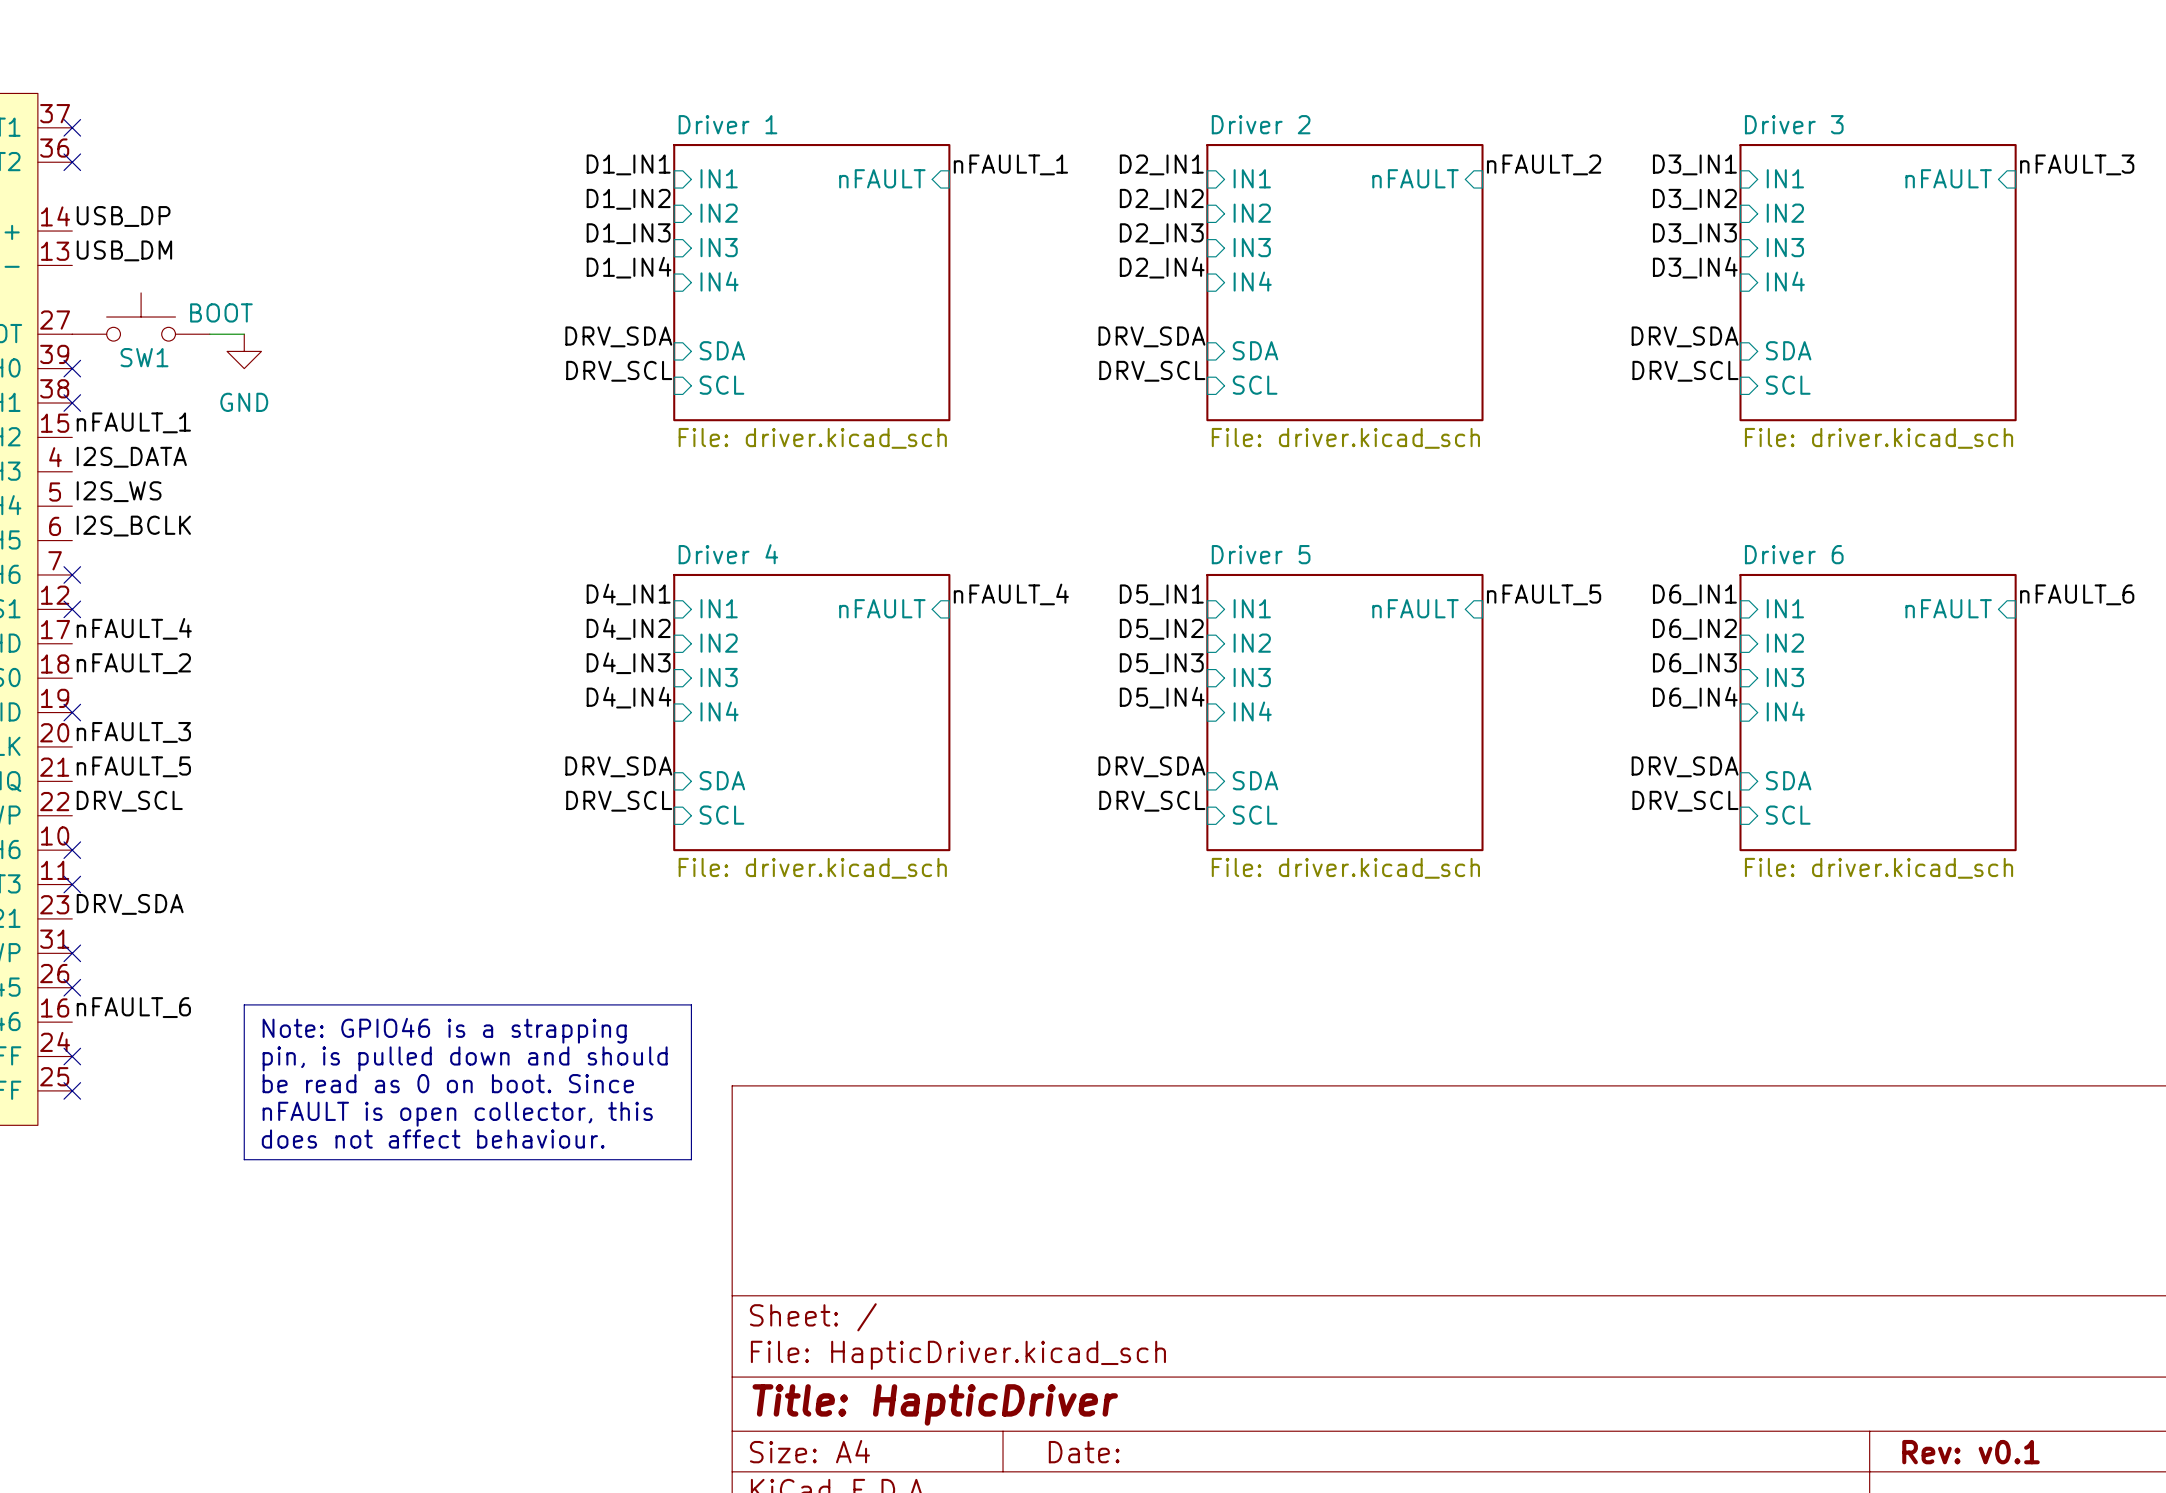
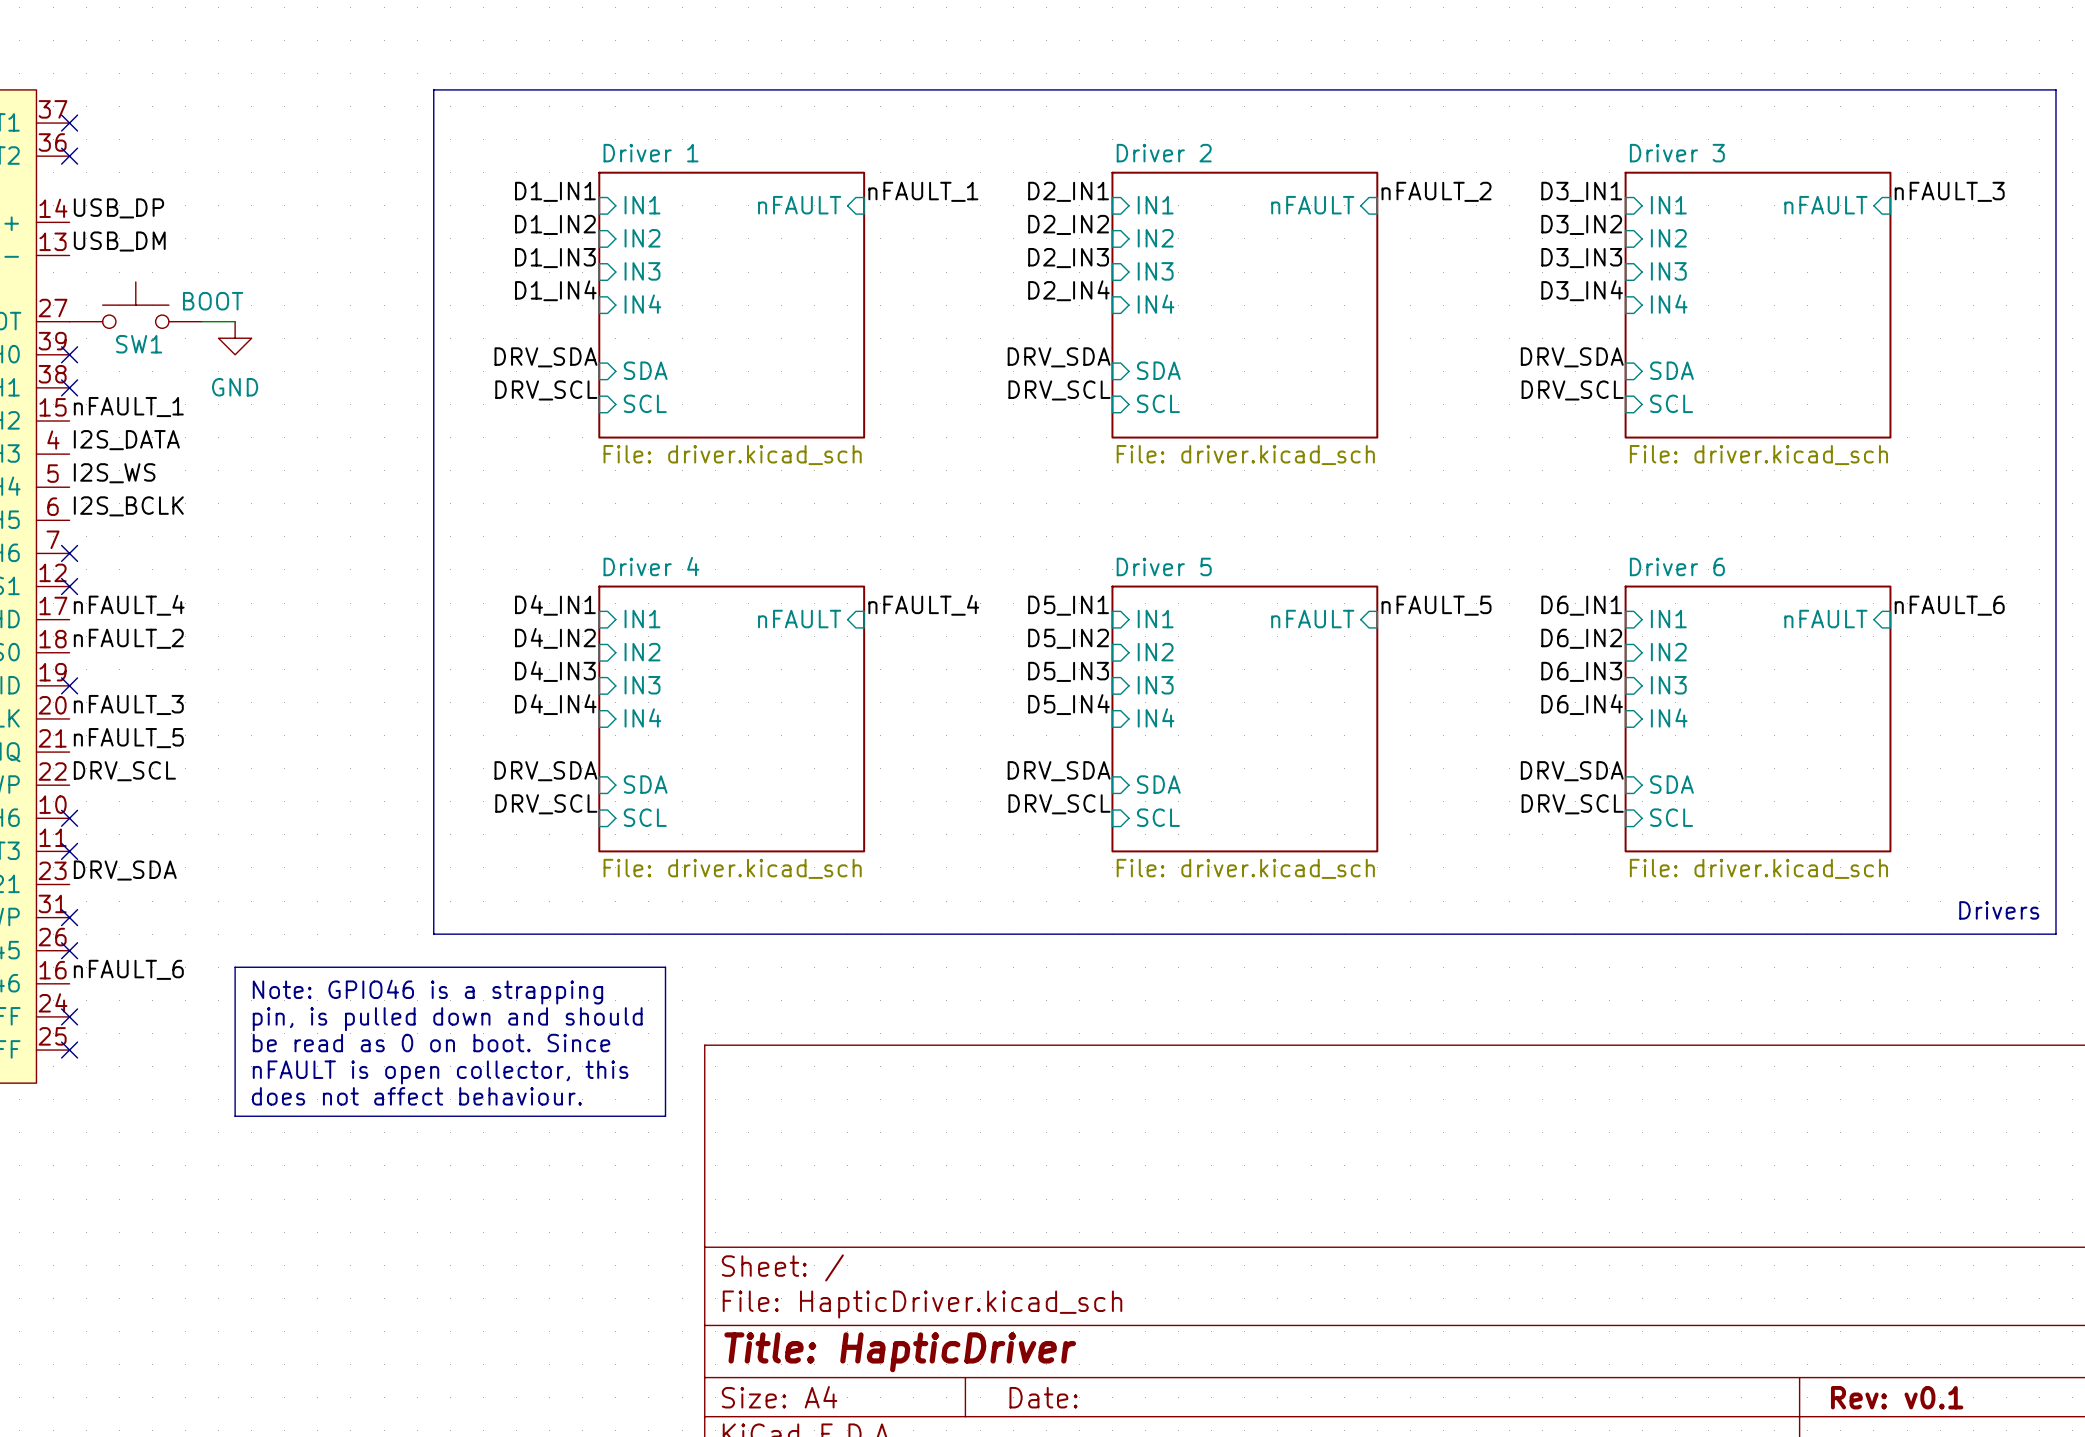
line: none -> (433, 89) (2055, 89) (2055, 934) (433, 934) (433, 89)
label position: D1_IN1 (628, 164) -> D1_IN1 (555, 191)
label position: nFAULT_1 (1010, 164) -> nFAULT_1 (923, 191)
label position: D2_IN1 (1161, 164) -> D2_IN1 (1068, 191)
label position: nFAULT_2 (1544, 164) -> nFAULT_2 (1436, 191)
label position: D3_IN1 (1694, 164) -> D3_IN1 (1581, 191)
label position: nFAULT_3 (2077, 164) -> nFAULT_3 (1949, 191)
sheet pin position: IN1 (719, 178) -> IN1 (642, 205)
sheet pin position: nFAULT (882, 178) -> nFAULT (799, 205)
sheet pin position: IN1 (1252, 178) -> IN1 (1155, 205)
sheet pin position: nFAULT (1415, 178) -> nFAULT (1312, 205)
sheet pin position: IN1 (1785, 178) -> IN1 (1668, 205)
sheet pin position: nFAULT (1948, 178) -> nFAULT (1825, 205)
label position: D1_IN2 (628, 199) -> D1_IN2 (555, 224)
label position: D2_IN2 (1161, 199) -> D2_IN2 (1068, 224)
label position: D3_IN2 (1694, 199) -> D3_IN2 (1581, 224)
sheet pin position: IN2 (719, 213) -> IN2 (642, 238)
sheet pin position: IN2 (1252, 213) -> IN2 (1155, 238)
sheet pin position: IN2 (1785, 213) -> IN2 (1668, 238)
label position: D1_IN3 (628, 233) -> D1_IN3 (555, 258)
label position: D2_IN3 (1161, 233) -> D2_IN3 (1068, 258)
label position: D3_IN3 (1694, 233) -> D3_IN3 (1581, 258)
sheet pin position: IN3 (719, 247) -> IN3 (642, 271)
sheet pin position: IN3 (1252, 247) -> IN3 (1155, 271)
sheet pin position: IN3 (1785, 247) -> IN3 (1668, 271)
label position: D1_IN4 (629, 267) -> D1_IN4 (555, 290)
label position: D2_IN4 (1162, 267) -> D2_IN4 (1068, 290)
label position: D3_IN4 (1695, 267) -> D3_IN4 (1582, 290)
sheet pin position: IN4 (719, 281) -> IN4 (642, 304)
sheet pin position: IN4 (1252, 281) -> IN4 (1156, 304)
sheet pin position: IN4 (1785, 281) -> IN4 (1669, 304)
sheet Driver 1 position: (811, 282) -> (731, 305)
sheet Driver 2 position: (1344, 282) -> (1244, 305)
sheet Driver 3 position: (1878, 282) -> (1758, 305)
label position: DRV_SDA (618, 336) -> DRV_SDA (545, 357)
label position: DRV_SDA (1151, 336) -> DRV_SDA (1059, 357)
label position: DRV_SDA (1685, 336) -> DRV_SDA (1572, 357)
sheet pin position: SDA (722, 350) -> SDA (645, 370)
sheet pin position: SDA (1255, 350) -> SDA (1158, 370)
sheet pin position: SDA (1788, 350) -> SDA (1671, 370)
label position: DRV_SCL (619, 371) -> DRV_SCL (546, 390)
label position: DRV_SCL (1152, 371) -> DRV_SCL (1059, 390)
label position: DRV_SCL (1685, 371) -> DRV_SCL (1572, 390)
sheet pin position: SCL (721, 385) -> SCL (645, 403)
sheet pin position: SCL (1255, 385) -> SCL (1158, 403)
sheet pin position: SCL (1788, 385) -> SCL (1671, 403)
label position: D4_IN1 (628, 594) -> D4_IN1 (555, 605)
label position: nFAULT_4 (1011, 594) -> nFAULT_4 (923, 605)
label position: D5_IN1 (1161, 594) -> D5_IN1 (1068, 605)
label position: nFAULT_5 (1544, 594) -> nFAULT_5 (1436, 605)
label position: D6_IN1 (1694, 594) -> D6_IN1 (1581, 605)
label position: nFAULT_6 (2077, 594) -> nFAULT_6 (1949, 605)
sheet pin position: IN1 (719, 608) -> IN1 (642, 619)
sheet pin position: nFAULT (882, 608) -> nFAULT (799, 619)
sheet pin position: IN1 (1252, 608) -> IN1 (1155, 619)
sheet pin position: nFAULT (1415, 608) -> nFAULT (1312, 619)
sheet pin position: IN1 (1785, 608) -> IN1 (1668, 619)
sheet pin position: nFAULT (1948, 608) -> nFAULT (1825, 619)
label position: D4_IN2 (628, 628) -> D4_IN2 (555, 638)
label position: D5_IN2 (1161, 629) -> D5_IN2 (1068, 638)
label position: D6_IN2 (1694, 629) -> D6_IN2 (1581, 638)
sheet pin position: IN2 (719, 643) -> IN2 (642, 652)
sheet pin position: IN2 (1252, 643) -> IN2 (1155, 652)
sheet pin position: IN2 (1785, 643) -> IN2 (1668, 652)
label position: D4_IN3 (628, 663) -> D4_IN3 (555, 671)
label position: D5_IN3 (1161, 663) -> D5_IN3 (1068, 671)
label position: D6_IN3 (1694, 663) -> D6_IN3 (1581, 671)
sheet pin position: IN3 (719, 677) -> IN3 (642, 685)
sheet pin position: IN3 (1252, 677) -> IN3 (1155, 685)
sheet pin position: IN3 (1785, 677) -> IN3 (1668, 685)
label position: D4_IN4 (629, 697) -> D4_IN4 (555, 704)
label position: D5_IN4 (1162, 697) -> D5_IN4 (1068, 704)
label position: D6_IN4 (1695, 697) -> D6_IN4 (1582, 704)
sheet pin position: IN4 (719, 711) -> IN4 (642, 717)
sheet pin position: IN4 (1252, 711) -> IN4 (1156, 717)
sheet pin position: IN4 (1785, 711) -> IN4 (1669, 717)
sheet Driver 4 position: (811, 712) -> (731, 718)
sheet Driver 5 position: (1344, 712) -> (1244, 718)
sheet Driver 6 position: (1878, 712) -> (1758, 718)
label position: DRV_SDA (618, 766) -> DRV_SDA (545, 771)
label position: DRV_SDA (1151, 766) -> DRV_SDA (1059, 771)
label position: DRV_SDA (1685, 766) -> DRV_SDA (1572, 771)
sheet pin position: SDA (722, 780) -> SDA (645, 784)
sheet pin position: SDA (1255, 780) -> SDA (1158, 784)
sheet pin position: SDA (1788, 780) -> SDA (1671, 784)
label position: DRV_SCL (619, 801) -> DRV_SCL (546, 804)
label position: DRV_SCL (1152, 801) -> DRV_SCL (1059, 804)
label position: DRV_SCL (1685, 801) -> DRV_SCL (1572, 804)
sheet pin position: SCL (721, 815) -> SCL (645, 817)
sheet pin position: SCL (1255, 815) -> SCL (1158, 817)
sheet pin position: SCL (1788, 815) -> SCL (1671, 817)
text: none -> Drivers (1999, 910)

